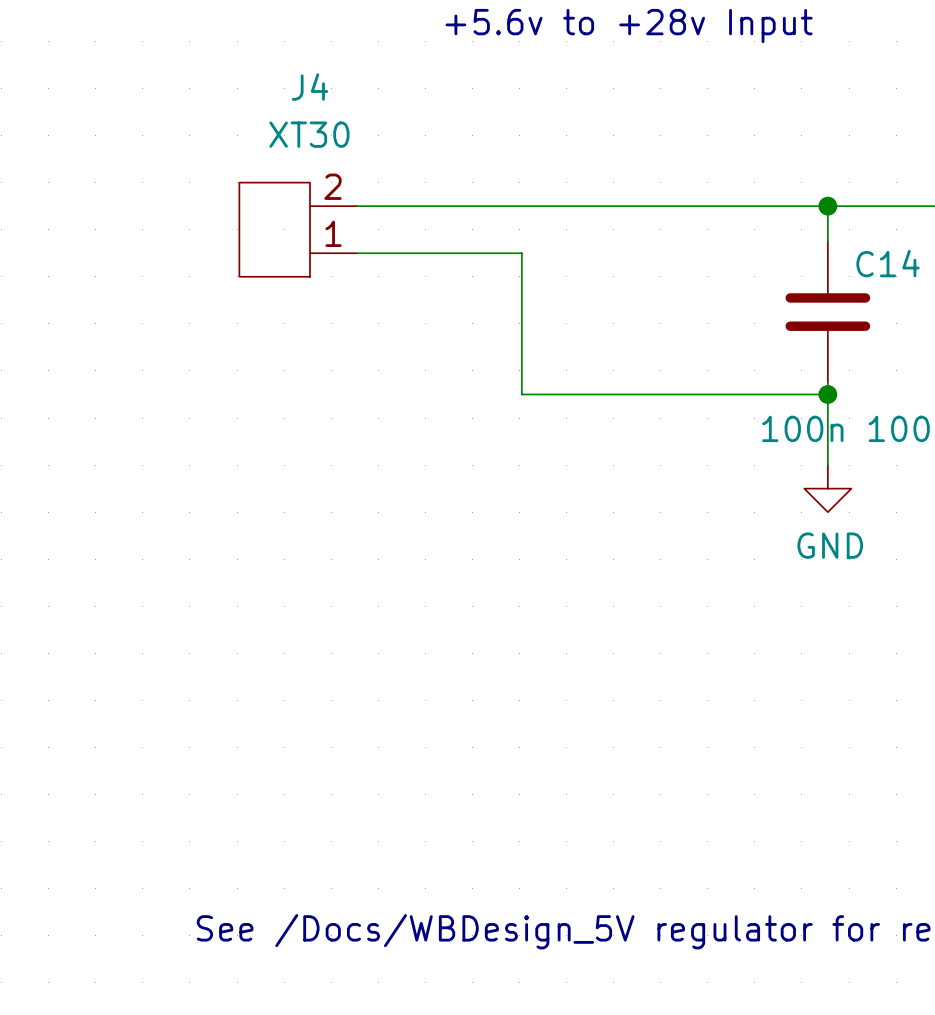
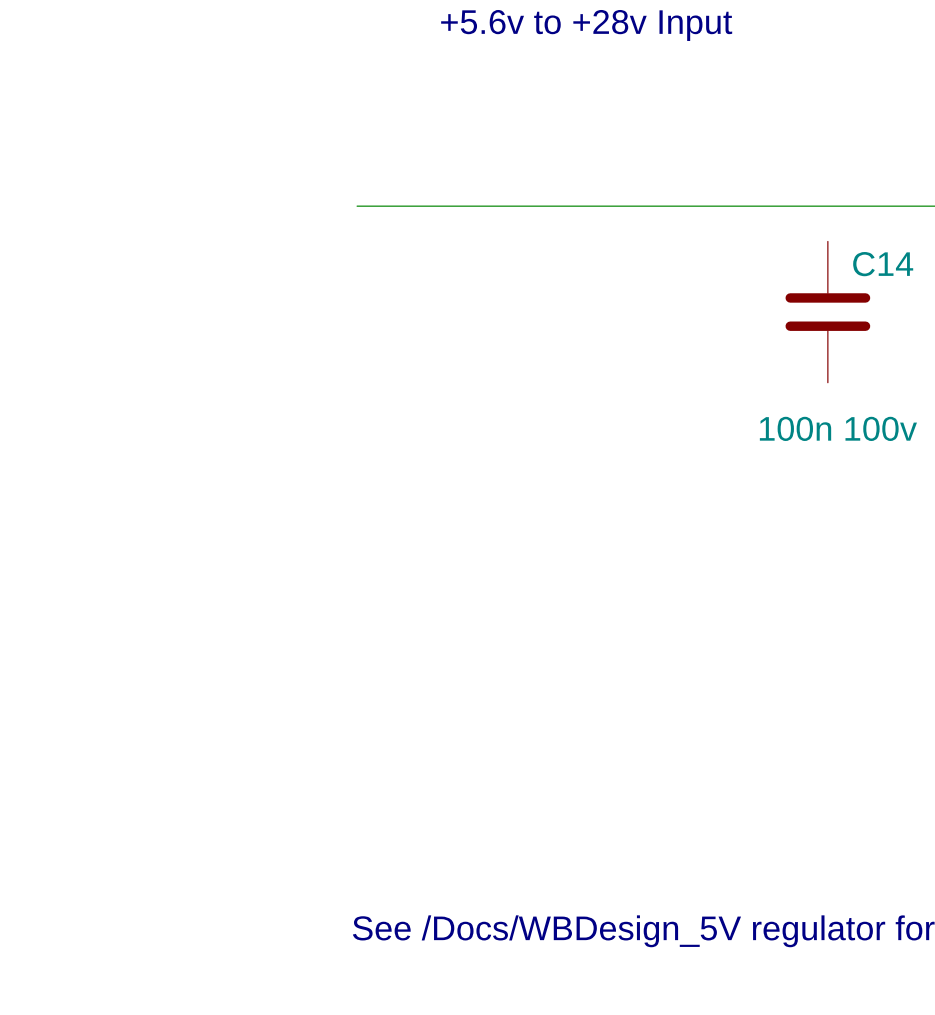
wire: (827, 206) (827, 241) -> none
junction: (827, 206) -> none
J4: XT30 (298, 229) -> none
wire: (357, 253) (521, 253) (521, 394) (827, 394) -> none
wire: (827, 382) (827, 465) -> none
junction: (827, 394) -> none
power symbol: GND (827, 488) -> none

